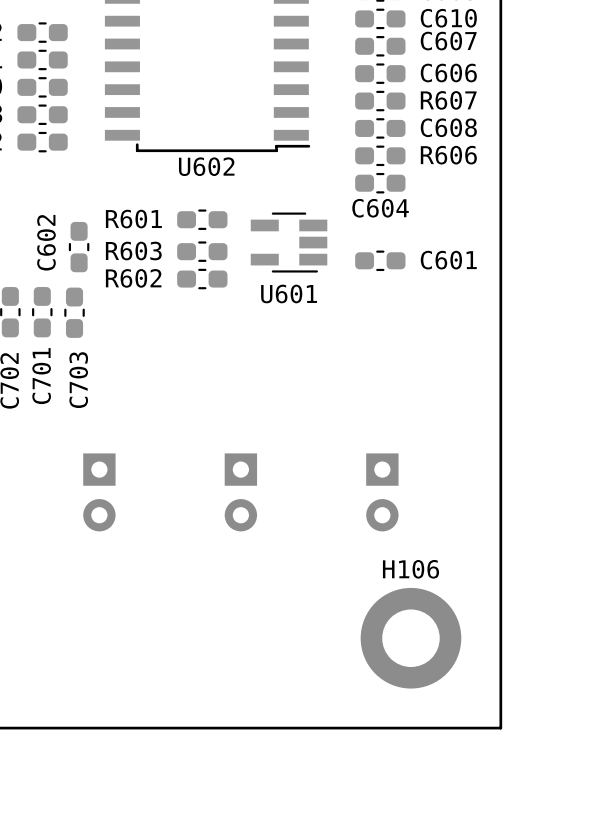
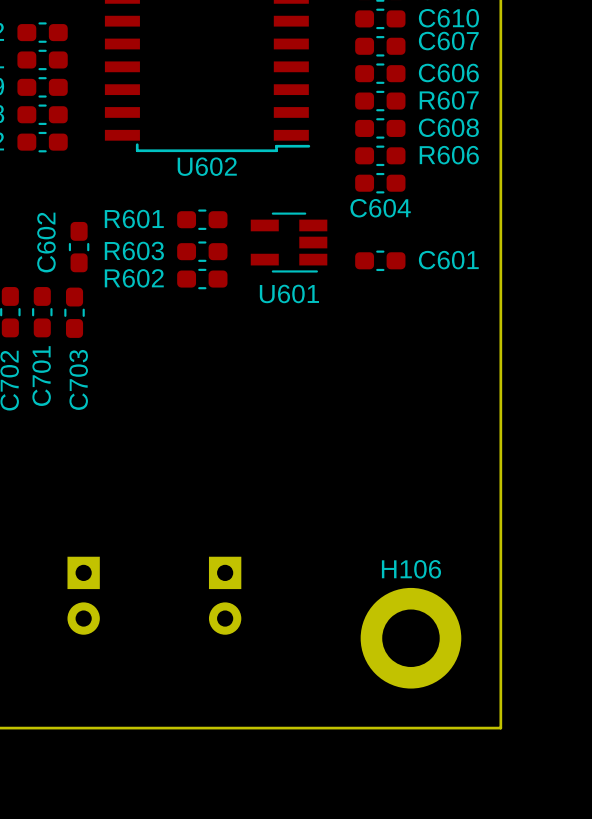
part: (99, 492) -> none
part: (240, 492) -> none
part: (382, 492) -> none
part: none -> (83, 595)
part: none -> (225, 595)

